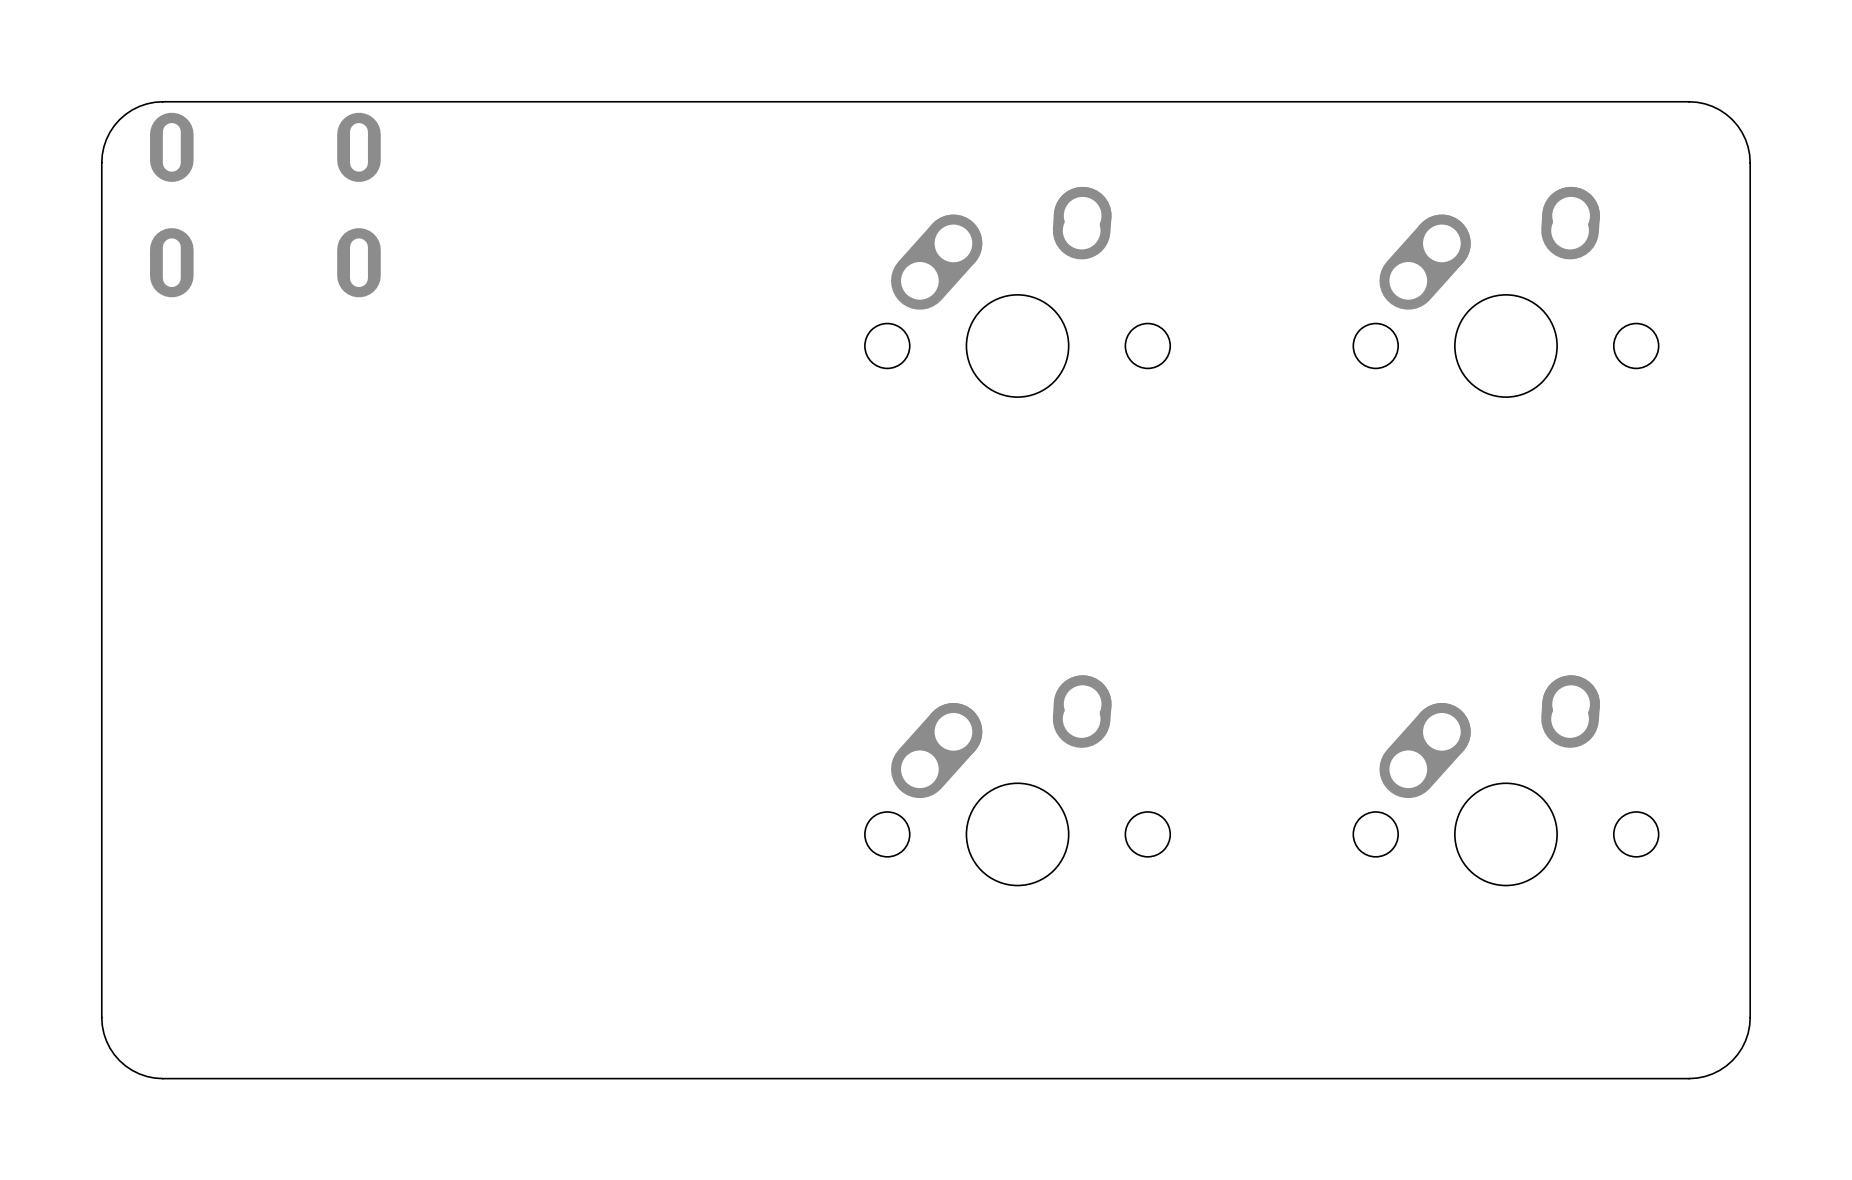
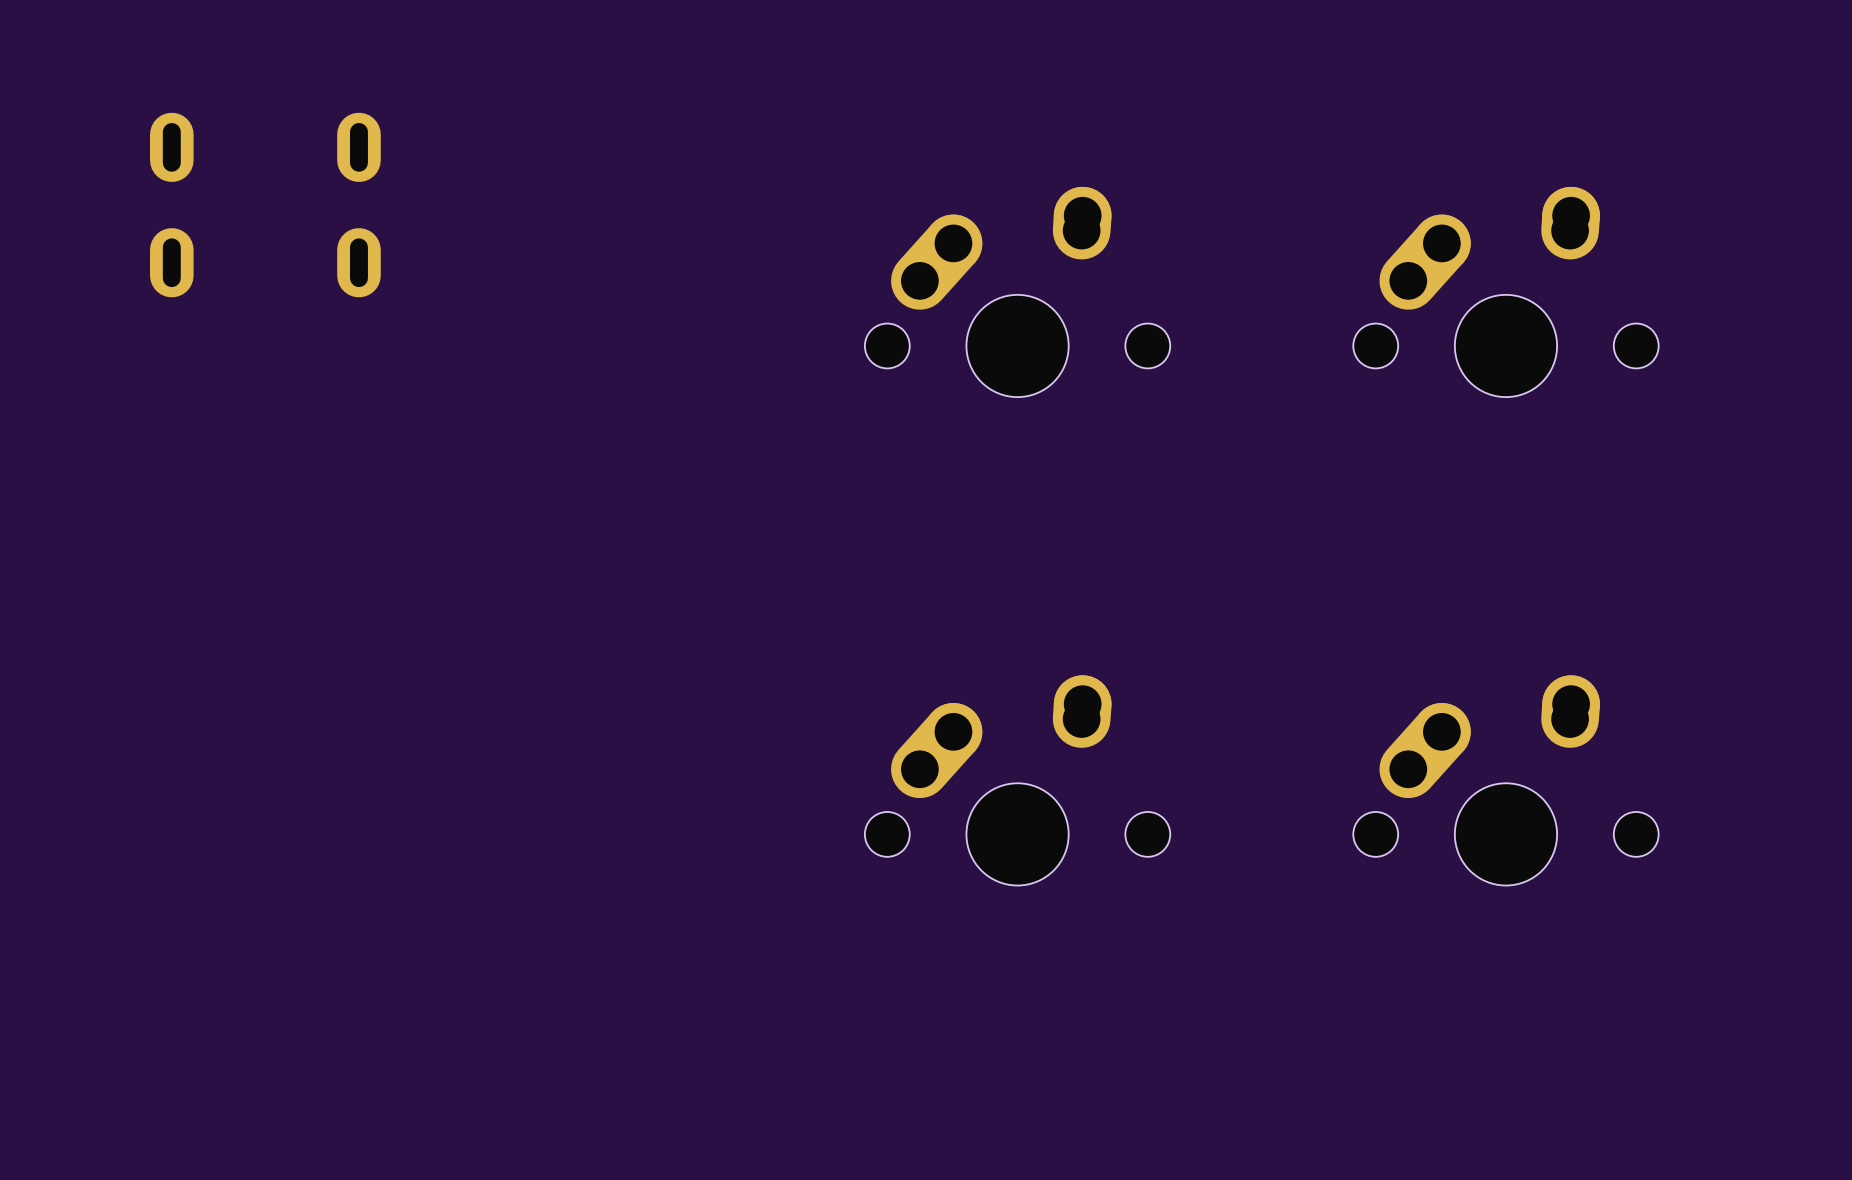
board edge: (162, 101) (1689, 101) (1704, 103) (1719, 109) (1732, 119) (1742, 132) (1748, 147) (1750, 162) (1750, 1017) (1748, 1033) (1742, 1048) (1732, 1060) (1719, 1070) (1704, 1076) (1689, 1078) (162, 1078) (147, 1076) (132, 1070) (119, 1060) (109, 1048) (103, 1033) (101, 1017) (101, 162) (106, 139) (119, 119) (139, 106) (162, 101) -> none

